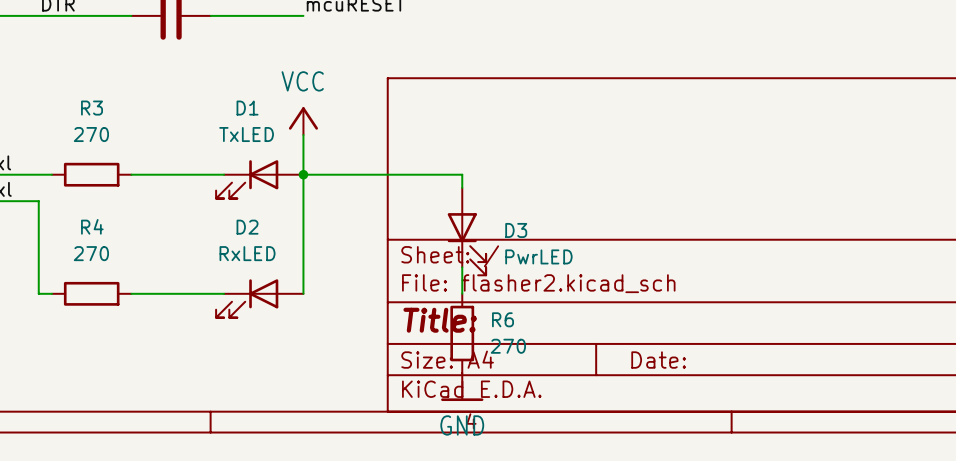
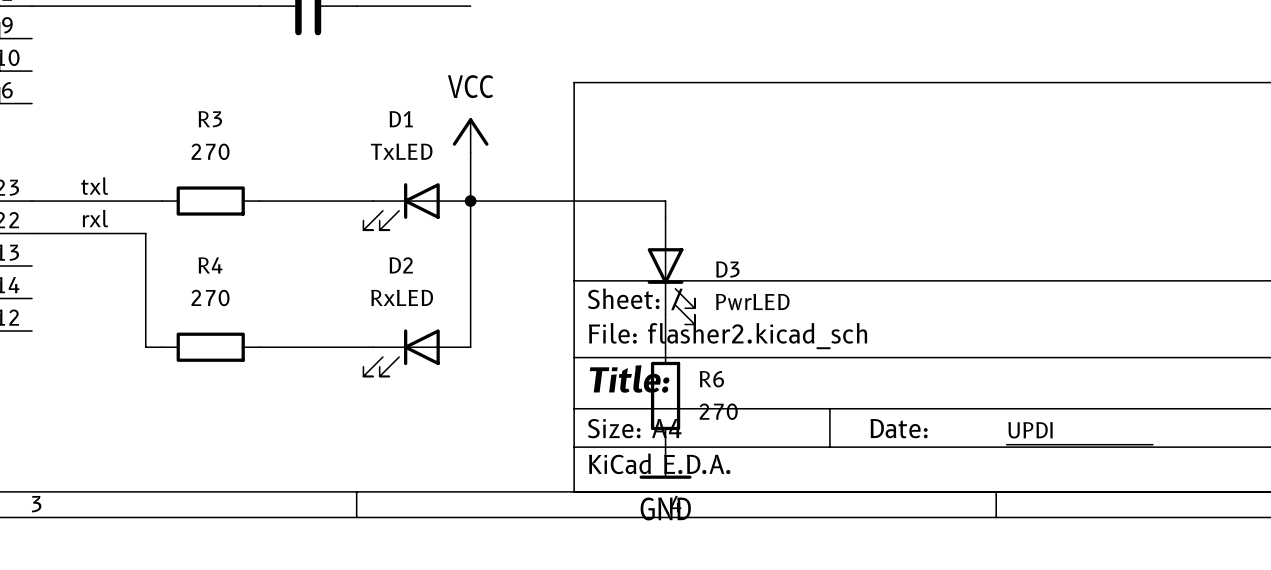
label: none -> UPDI (1030, 430)
wire: none -> (1006, 444) (1152, 444)

